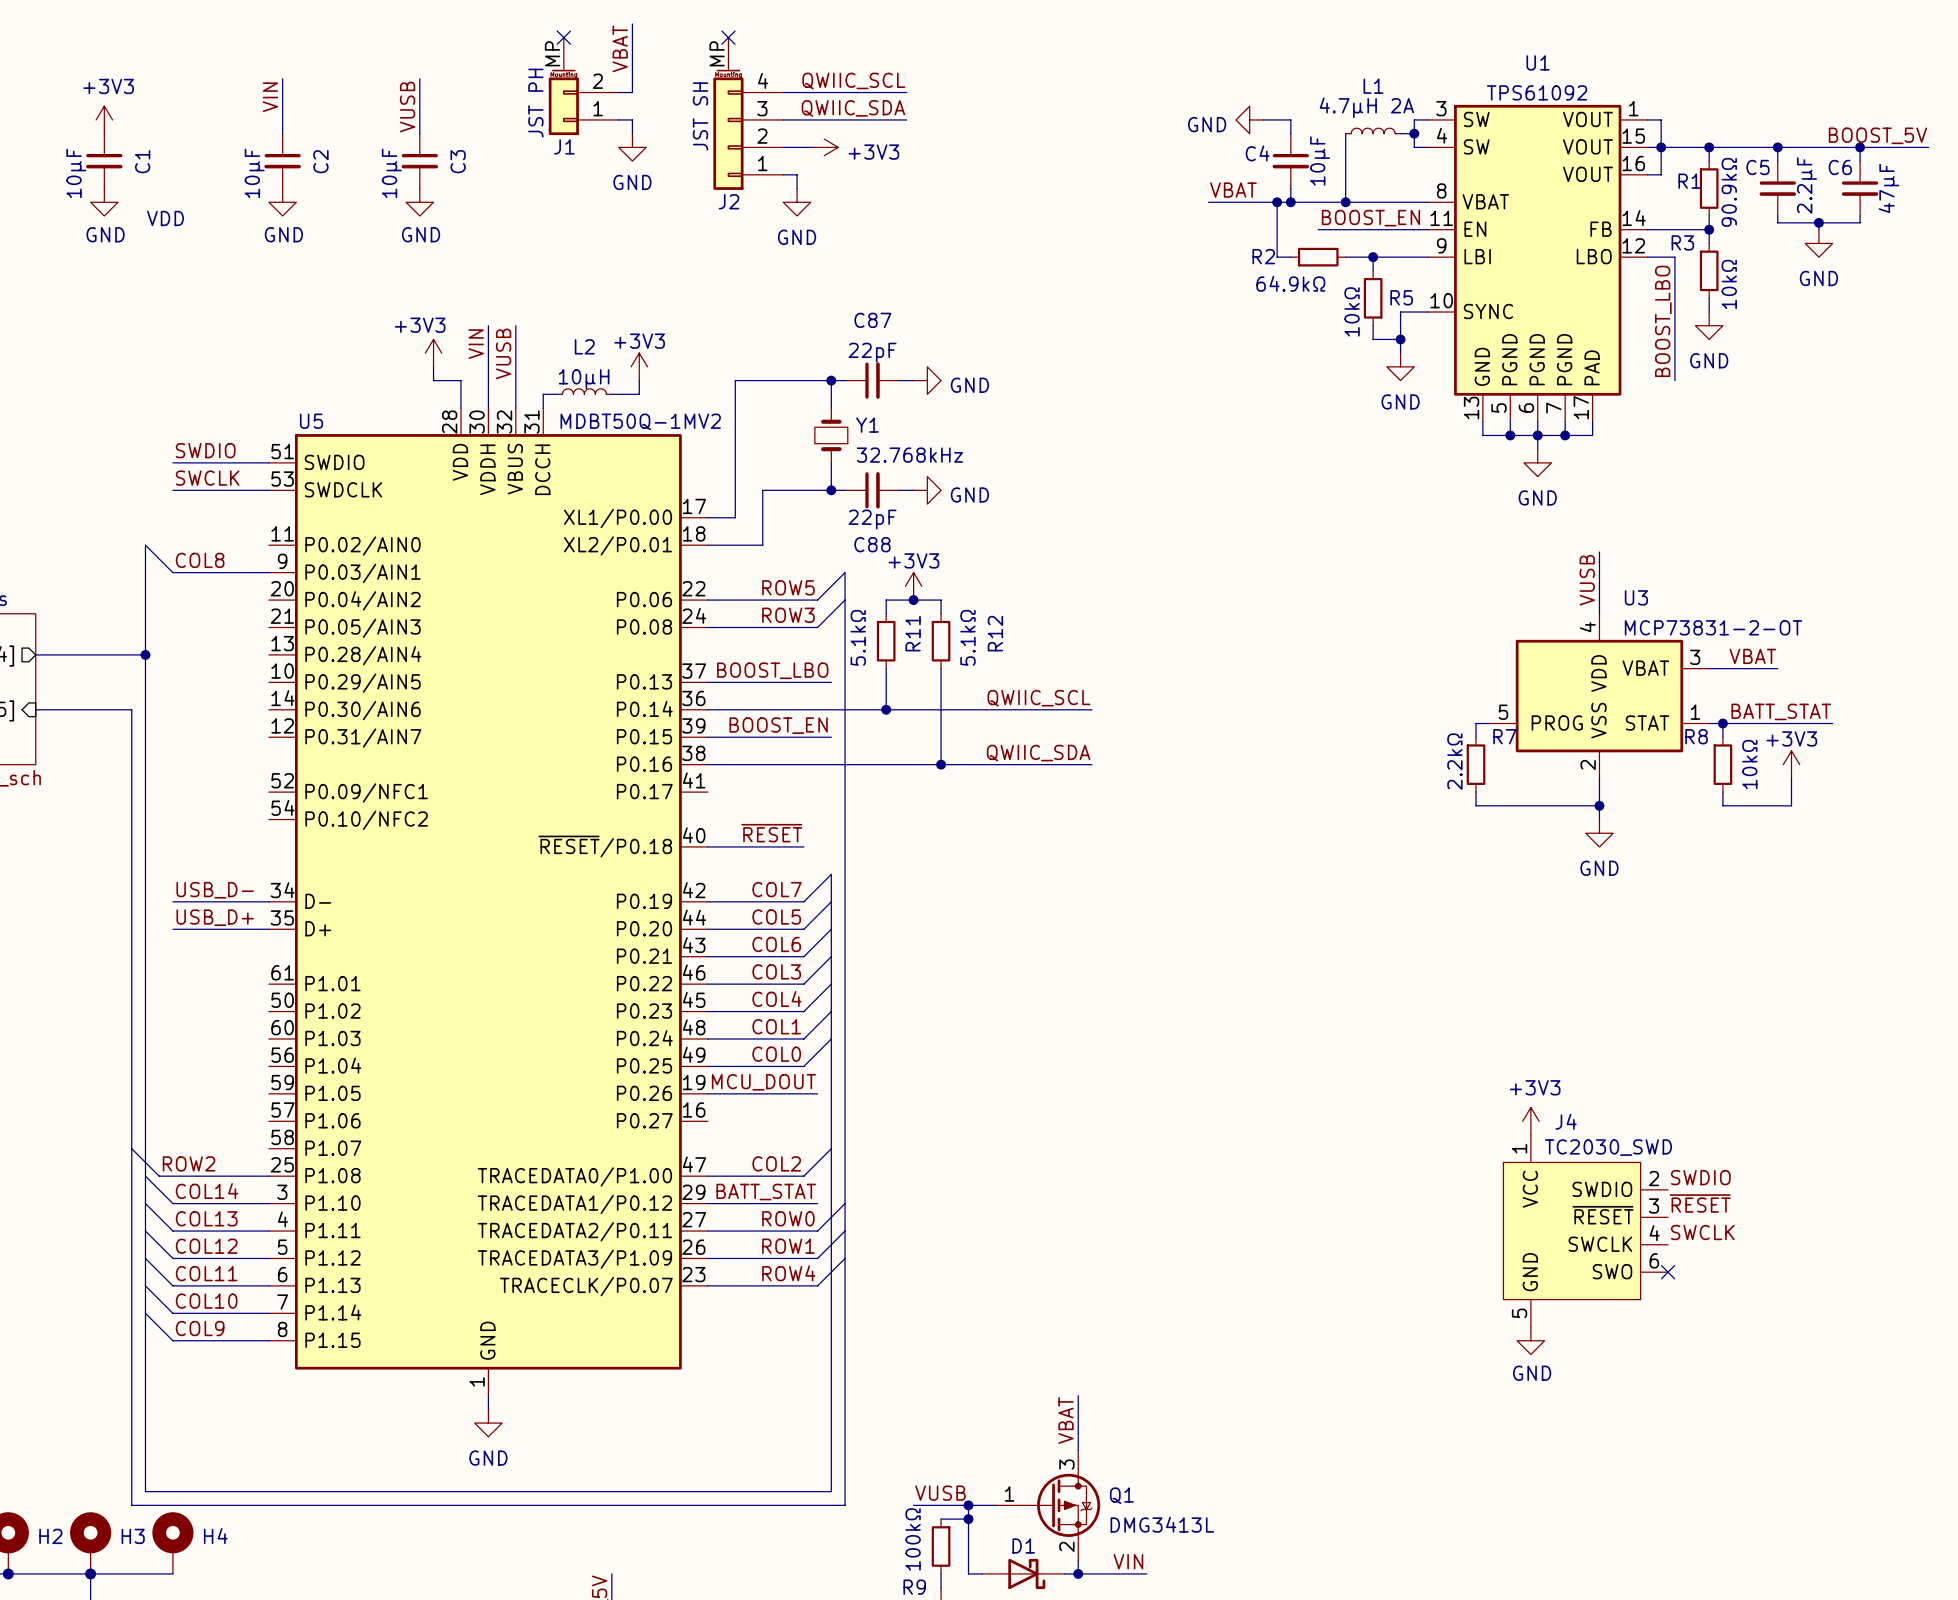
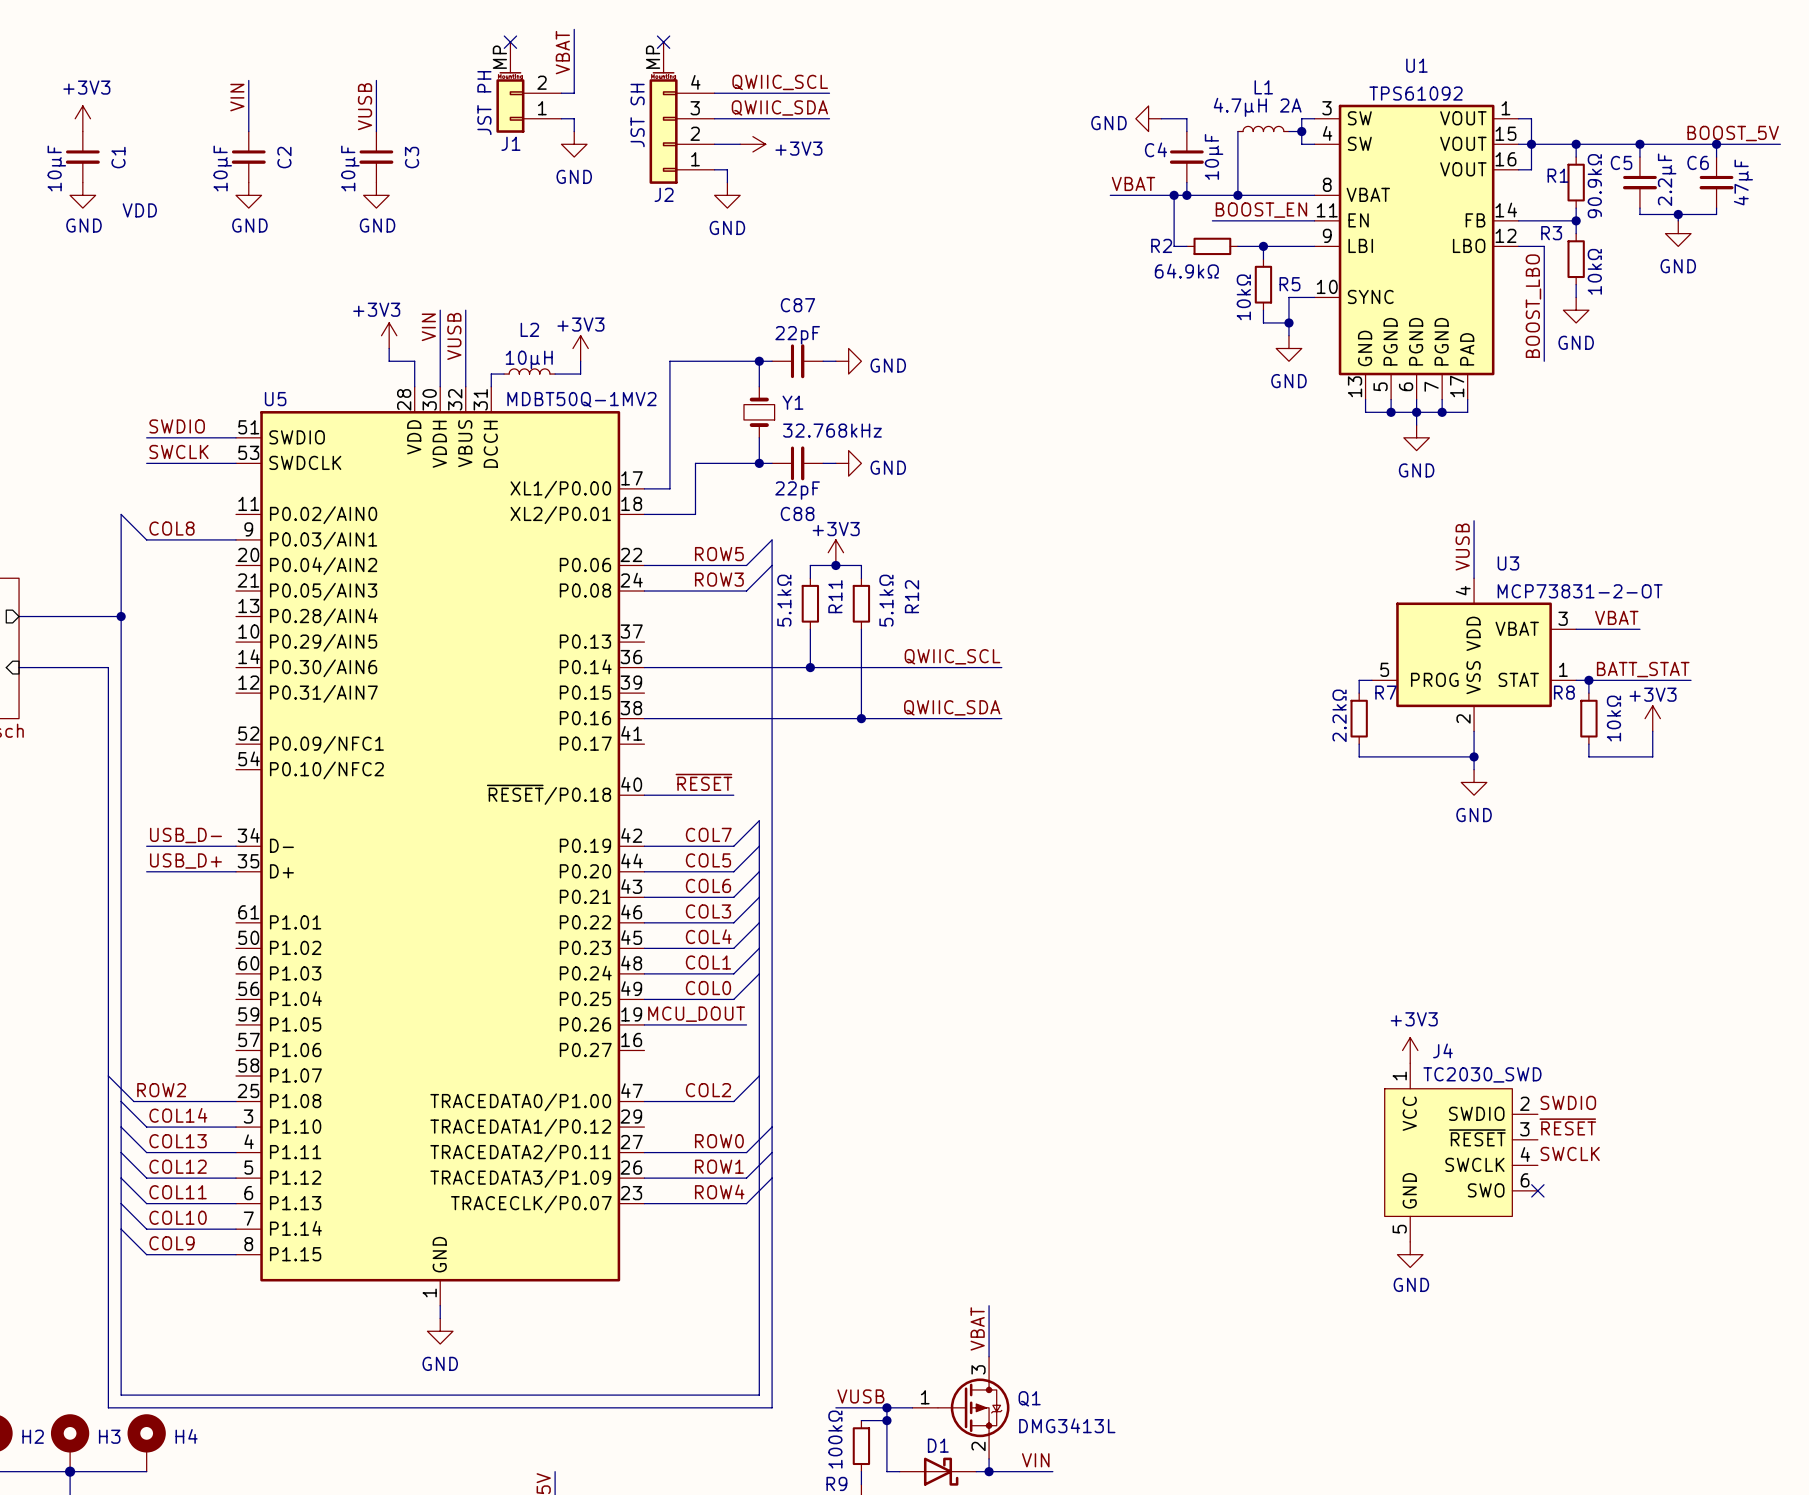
label: BOOST_LBO (772, 670) -> none
wire: (707, 682) (831, 682) -> none
label: BOOST_EN (778, 725) -> none
wire: (707, 737) (831, 737) -> none
label: BATT_STAT (766, 1192) -> none
wire: (707, 1203) (817, 1203) -> none

